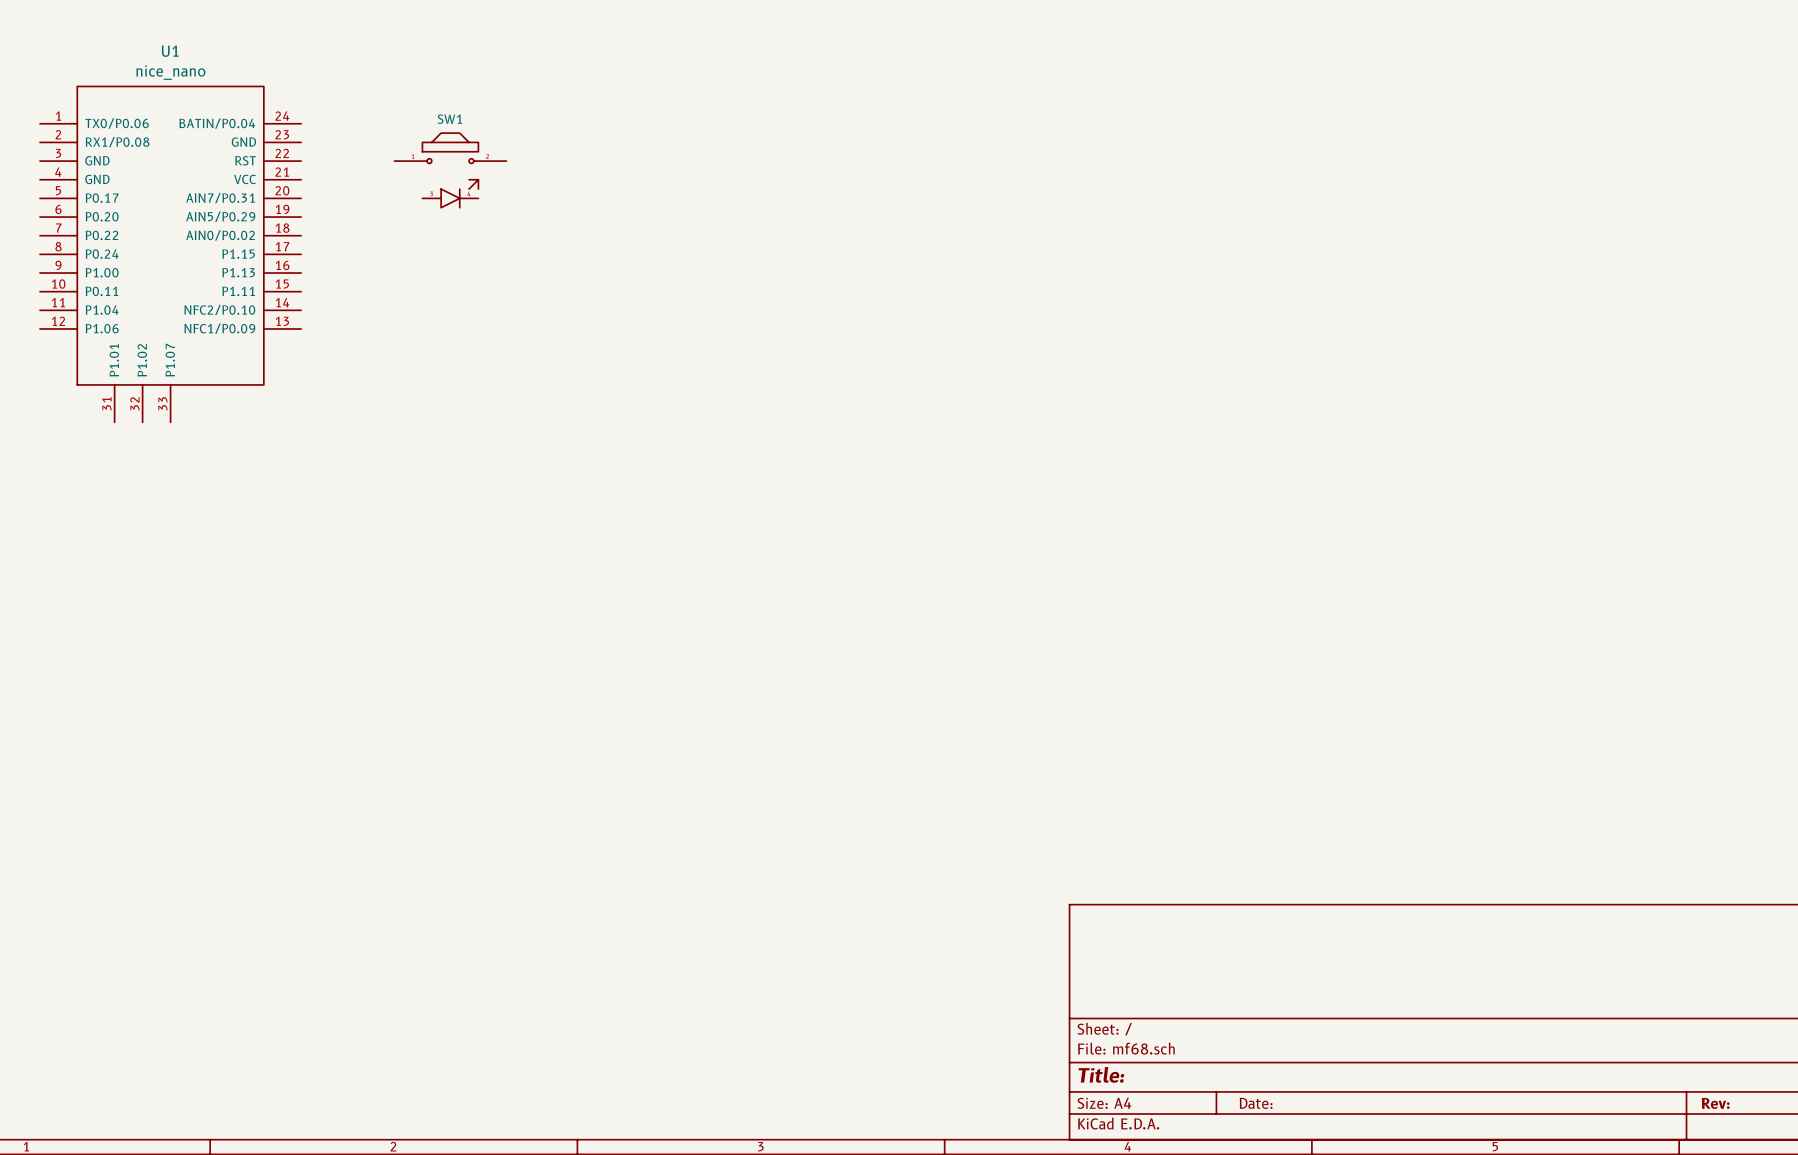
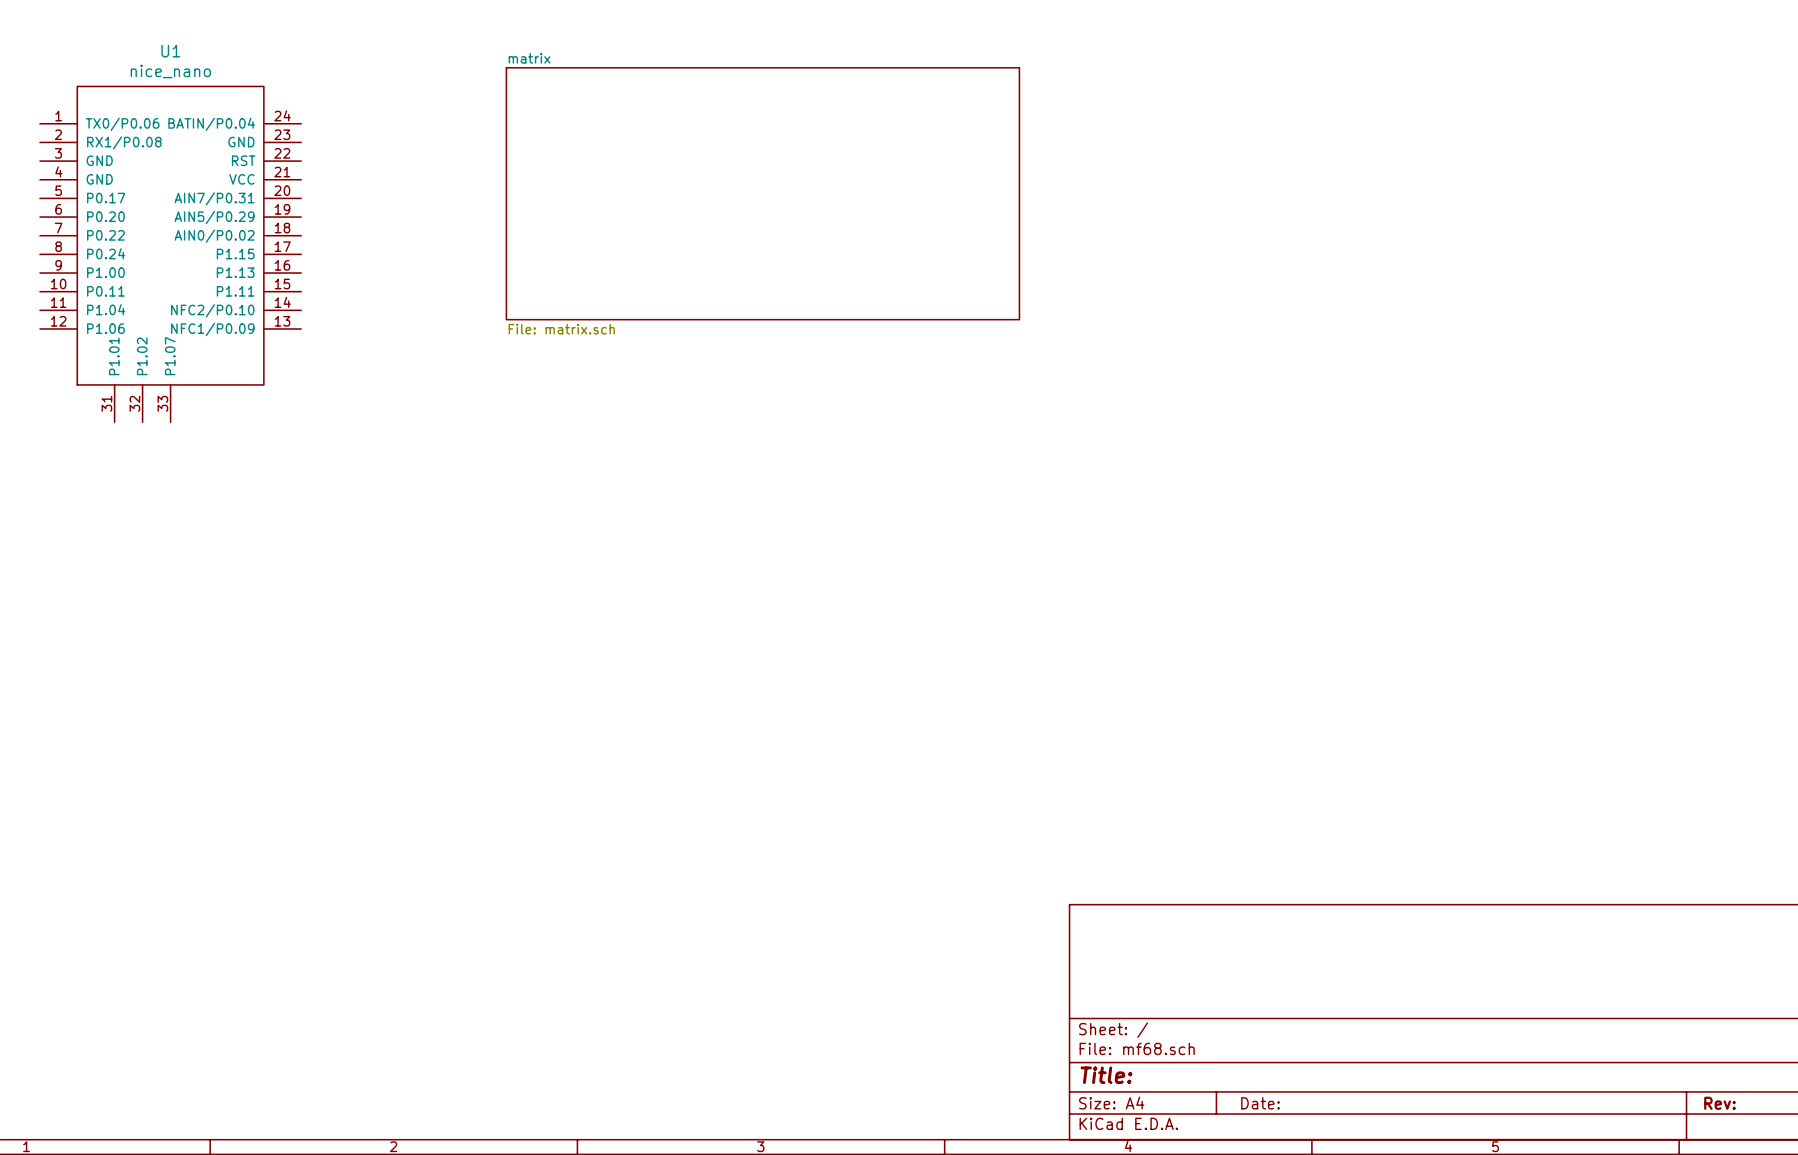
SW1: (450, 170) -> none
sheet matrix: none -> File: matrix.sch (762, 193)

